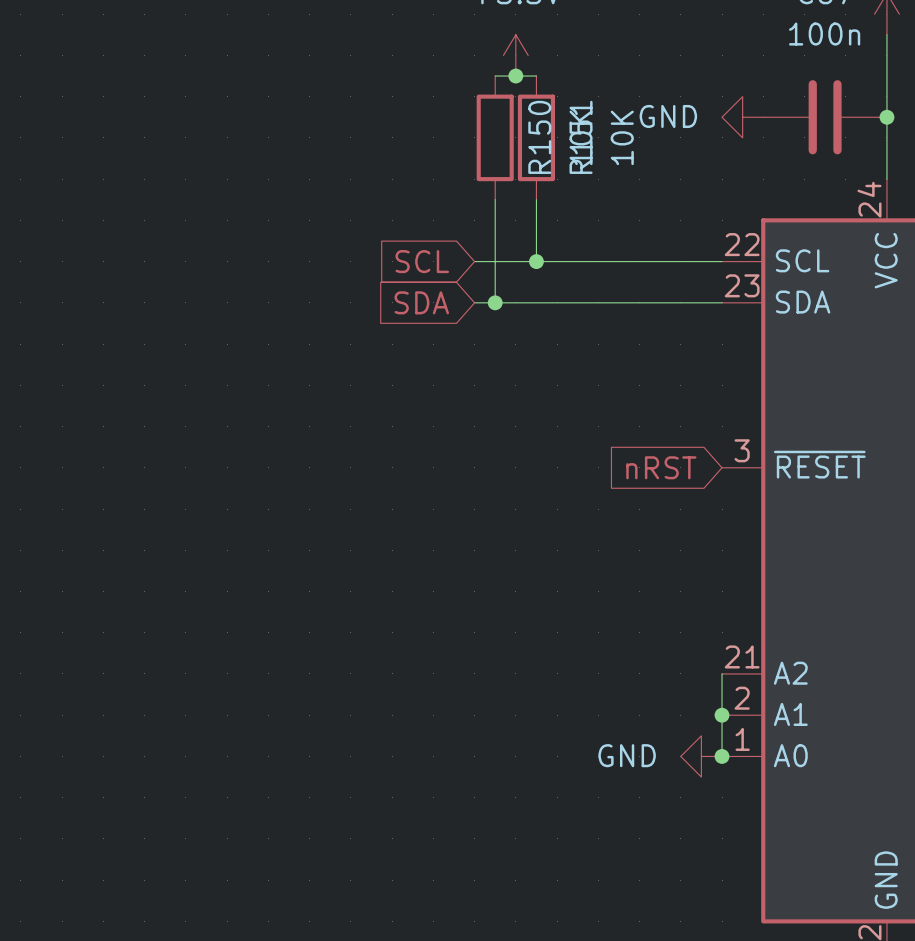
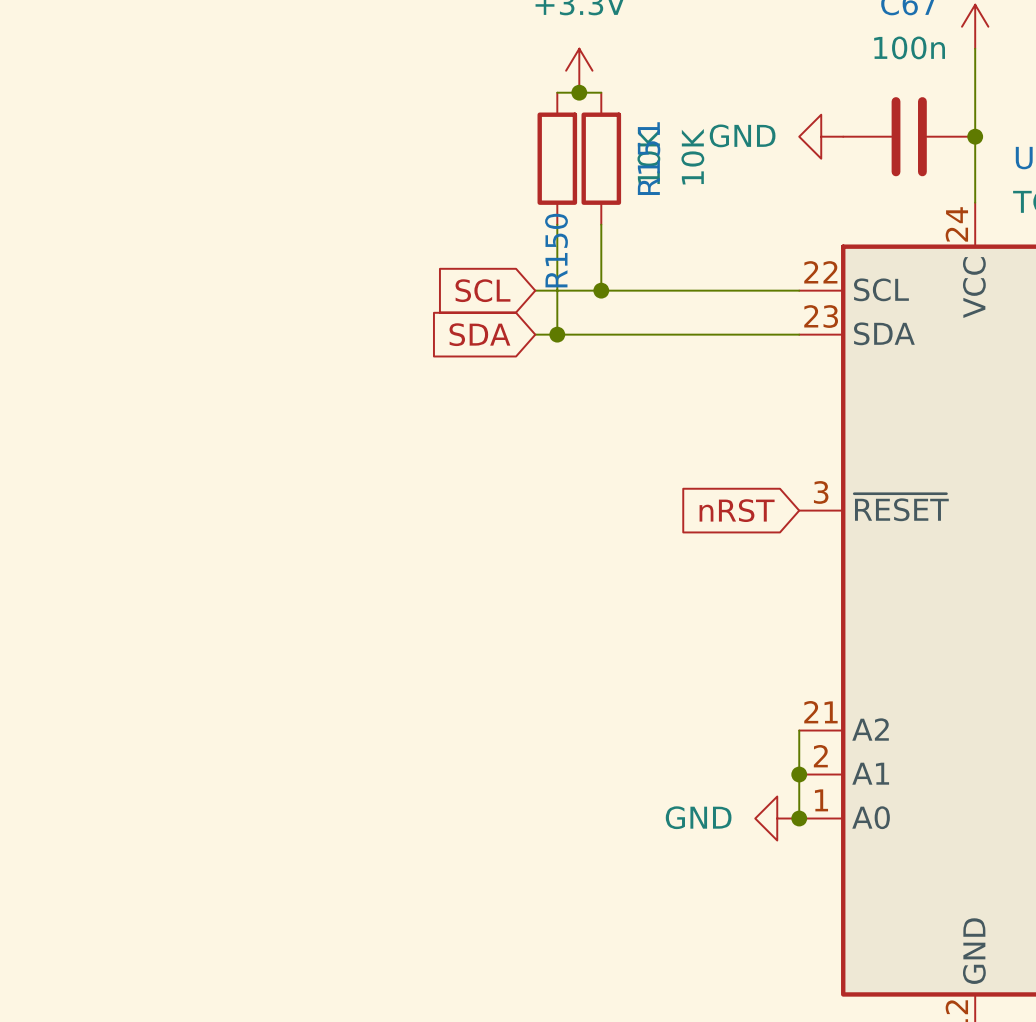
R150 name position: R150 (539, 137) -> R150 (556, 250)

